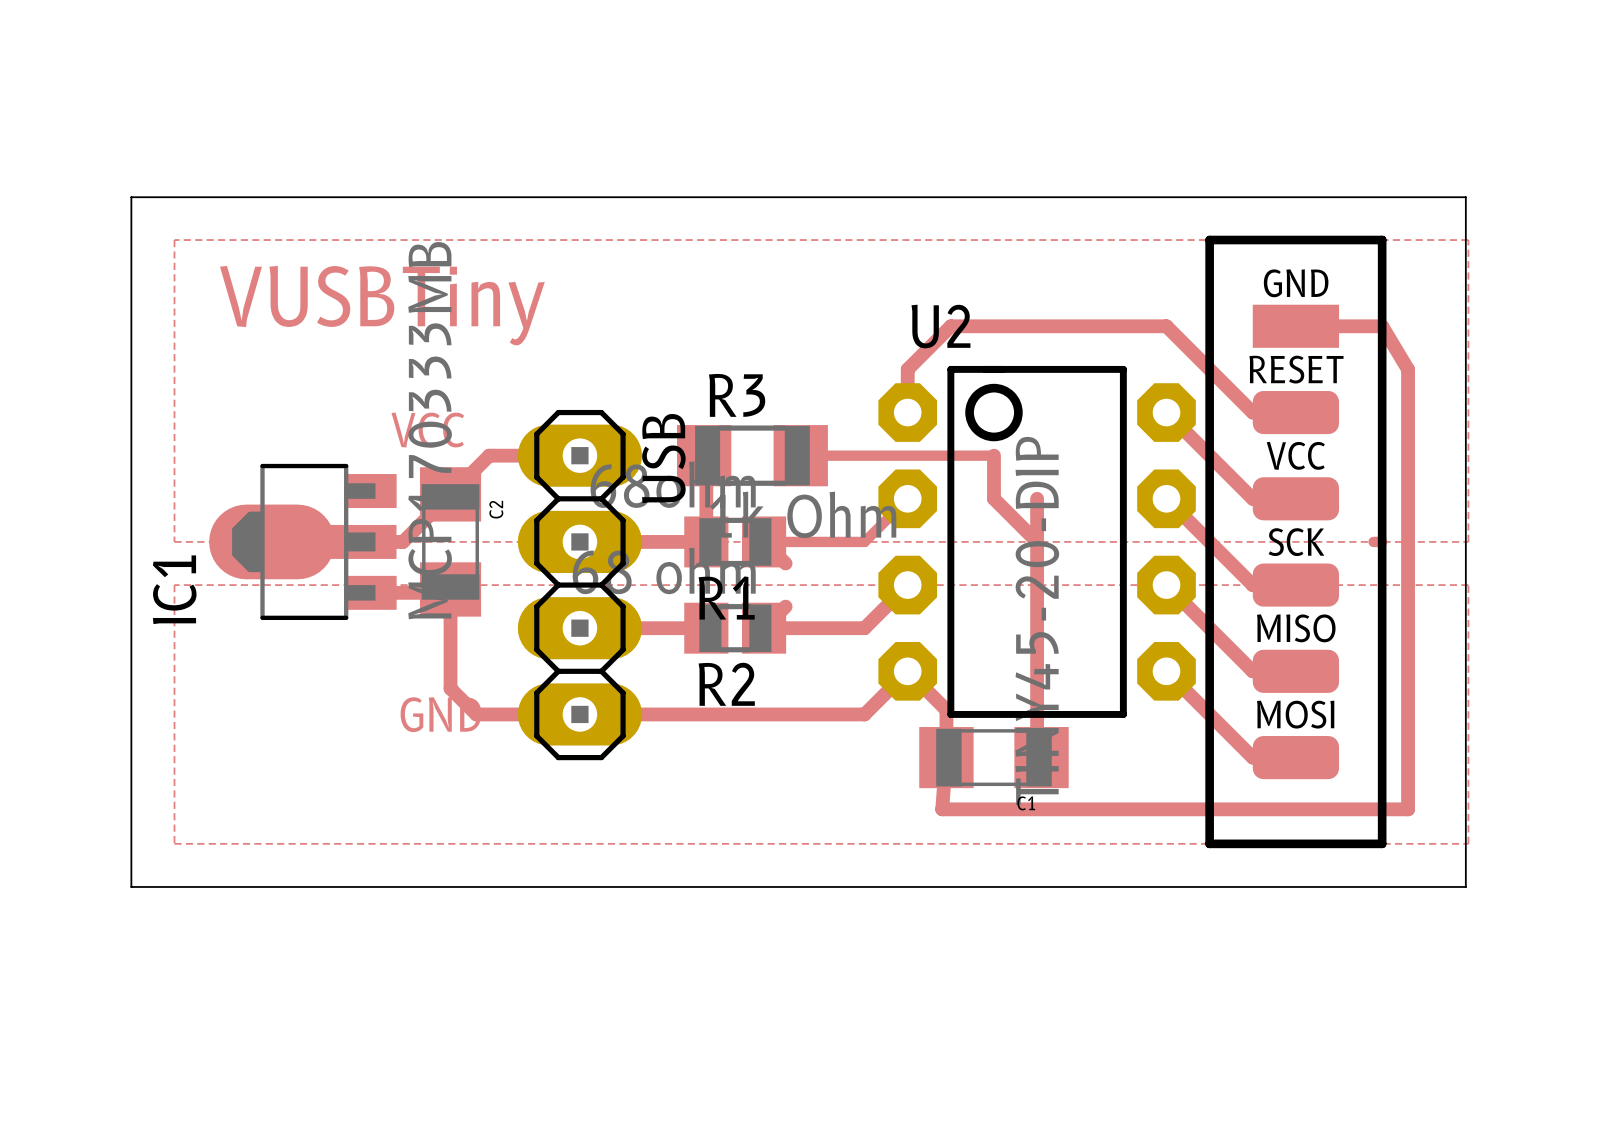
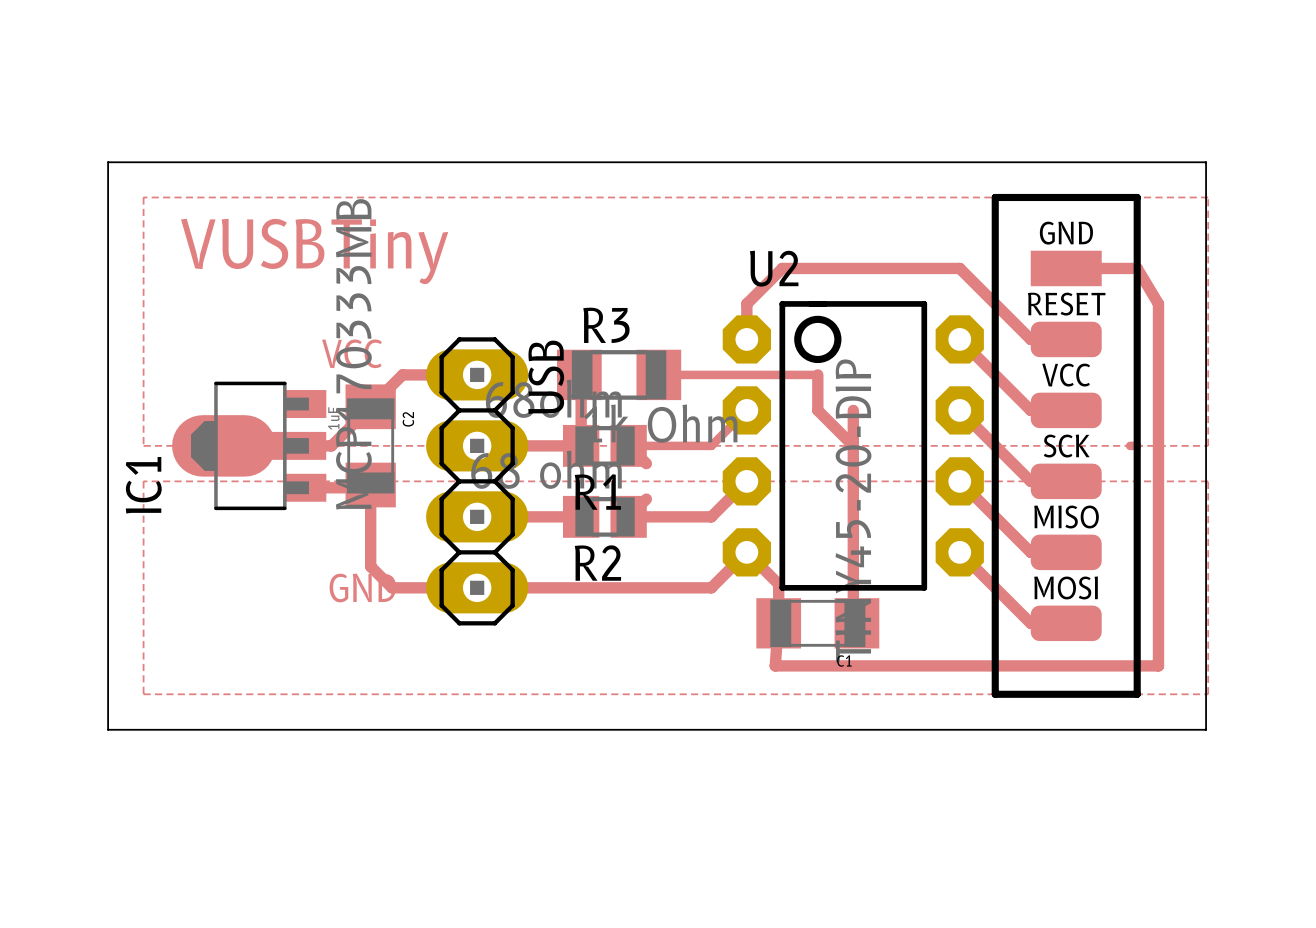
C2 value: none -> 1uF (333, 418)

